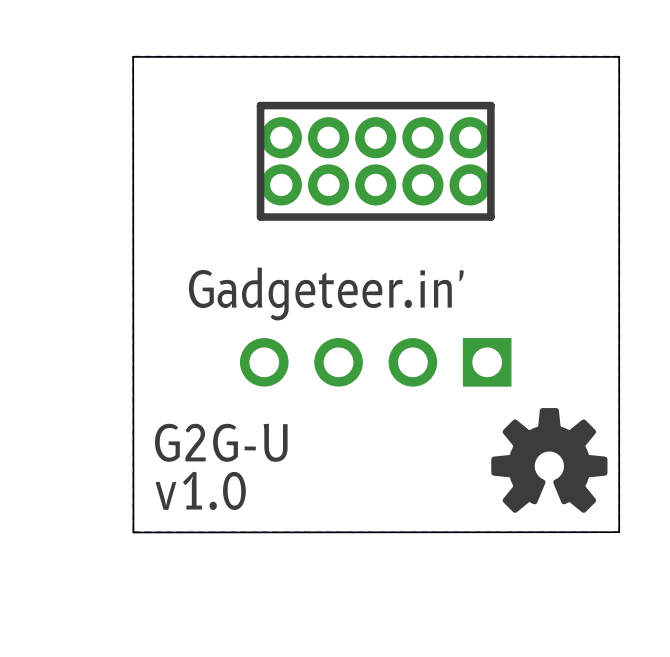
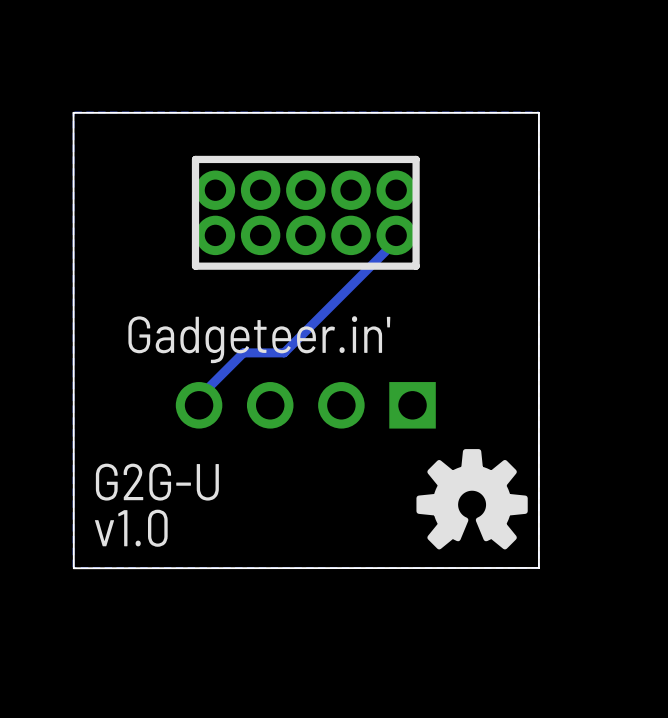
track: none -> (396, 235) (389, 239) (389, 247) (284, 352) (243, 352) (202, 393) (199, 405)

